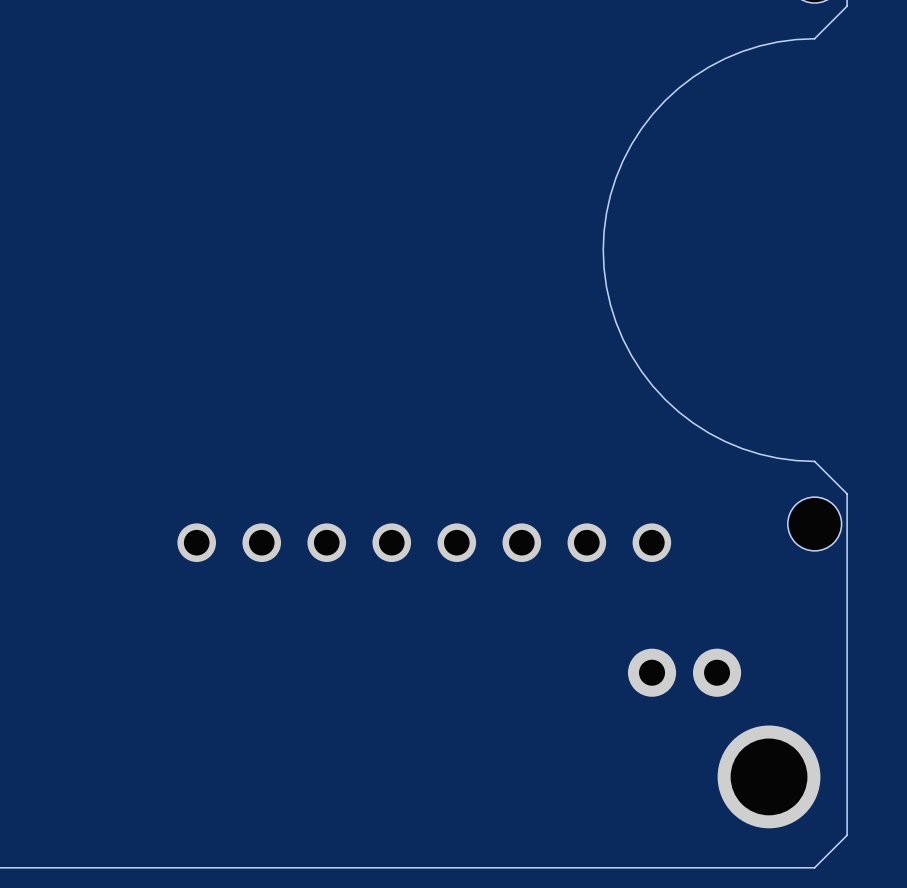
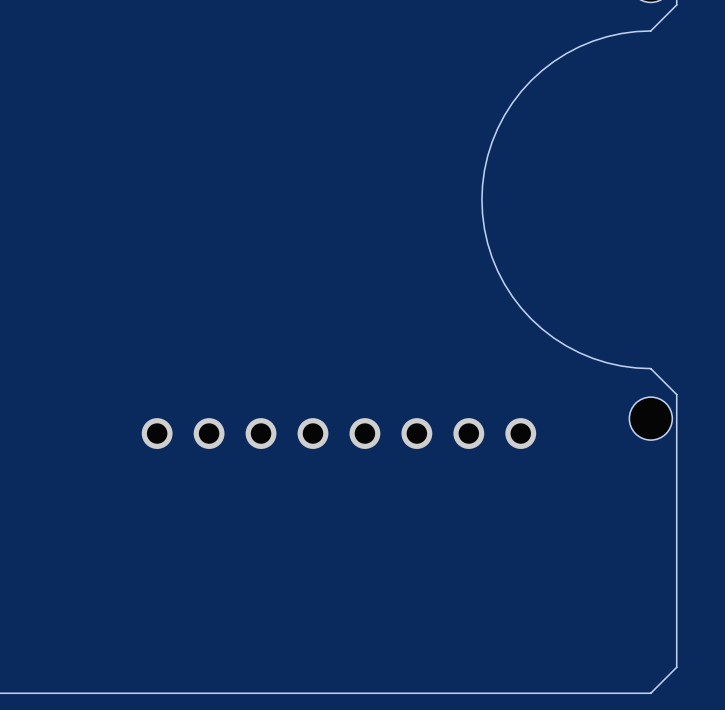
part: (684, 672) -> none
part: (769, 776) -> none

